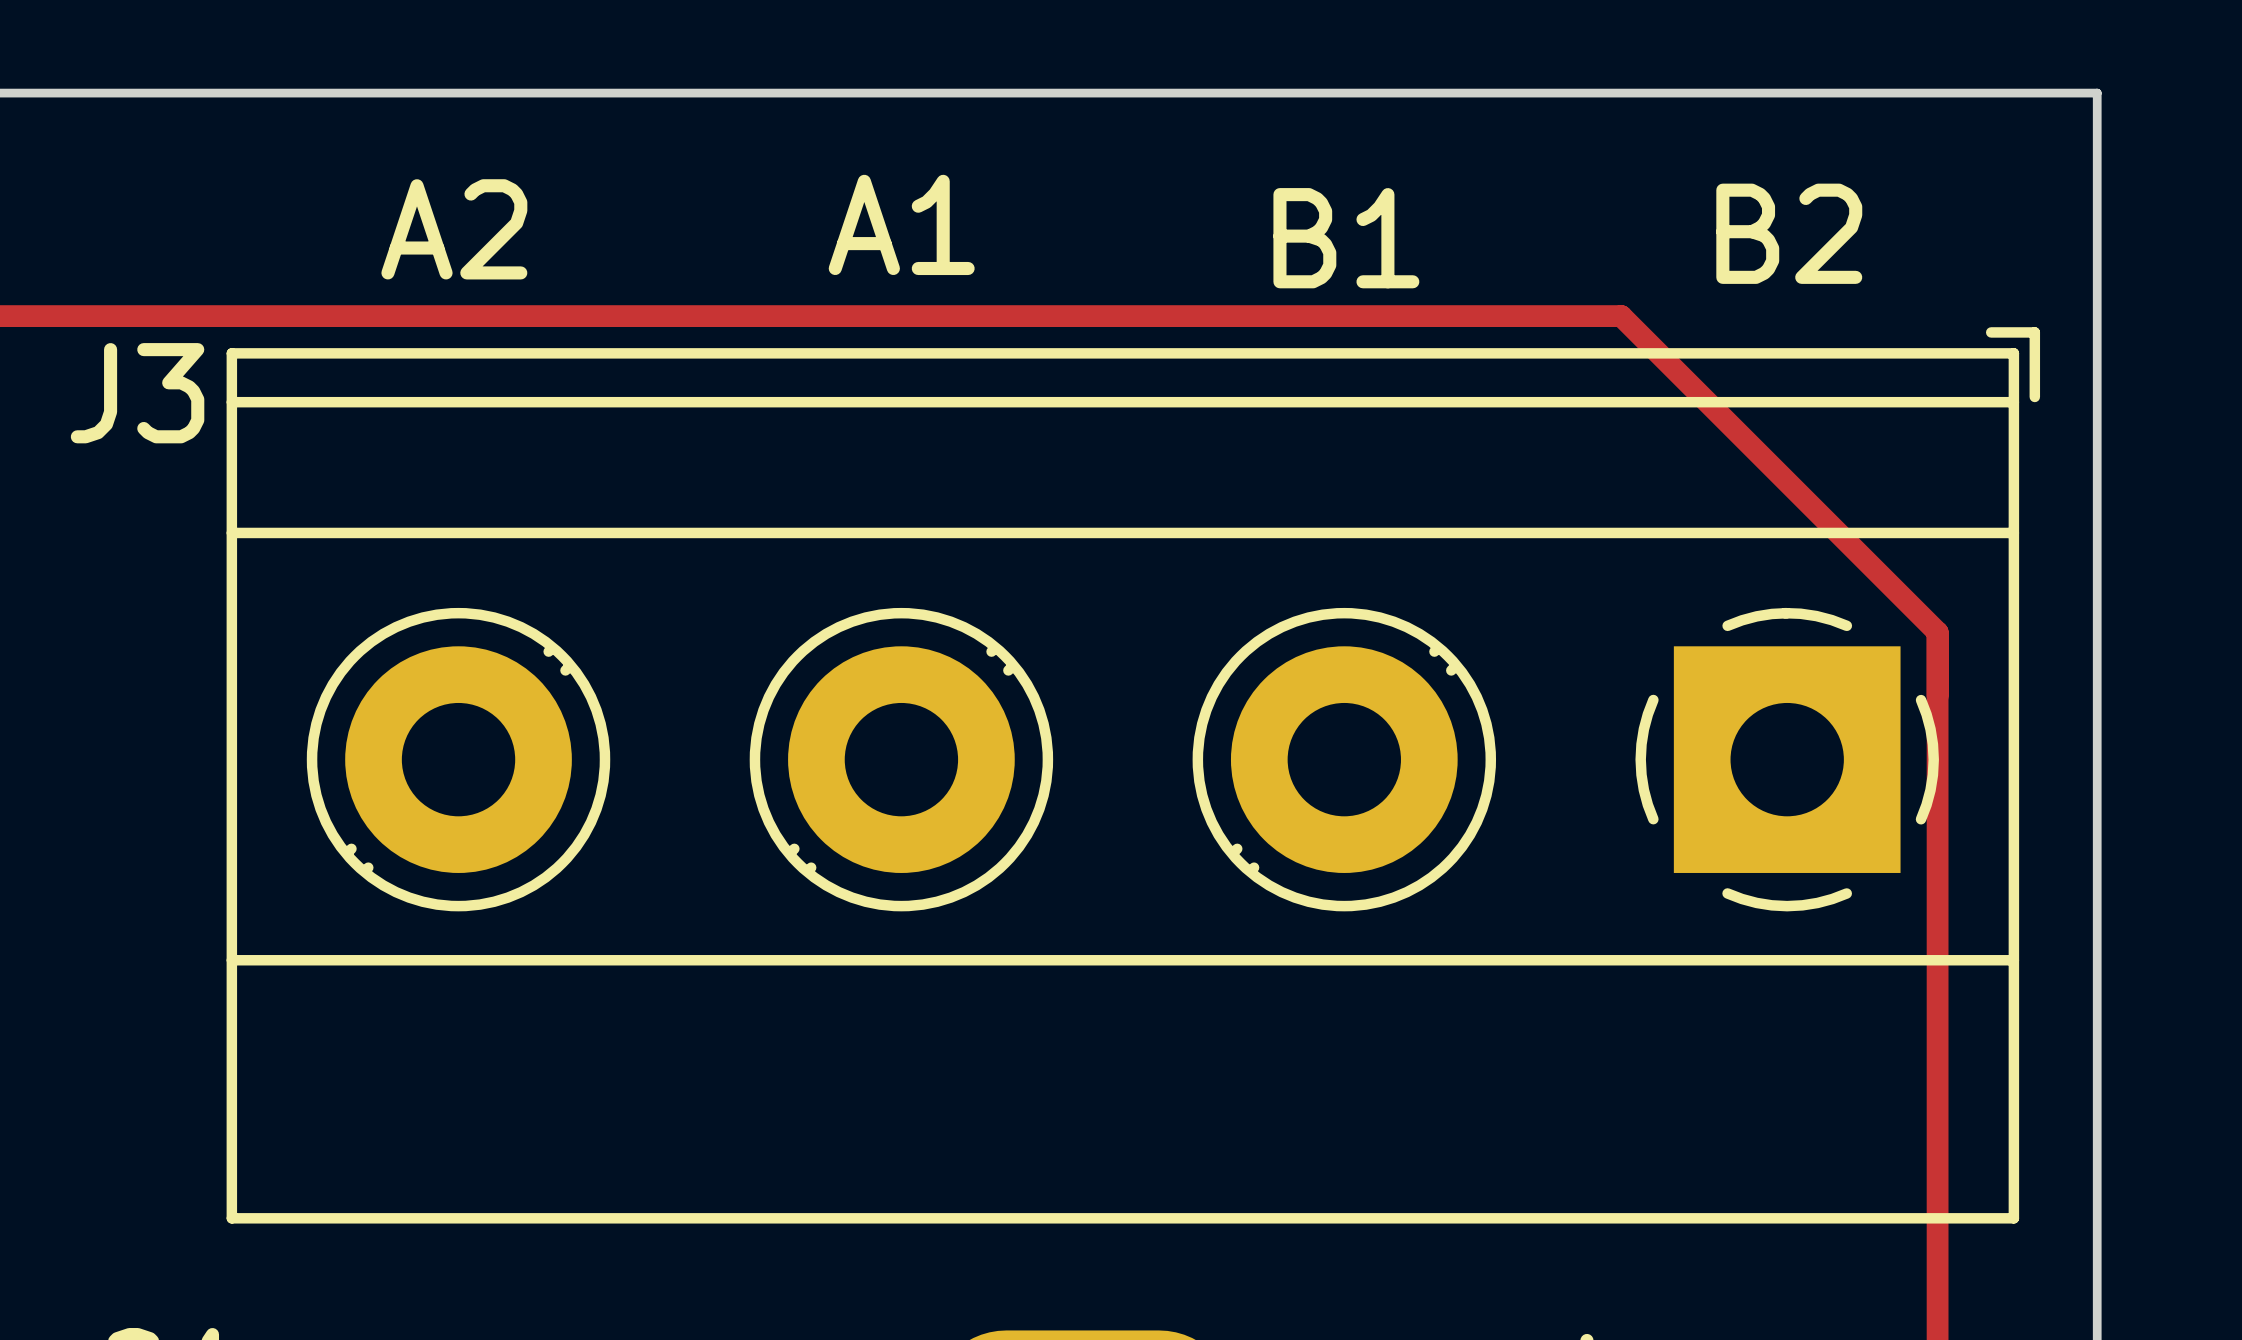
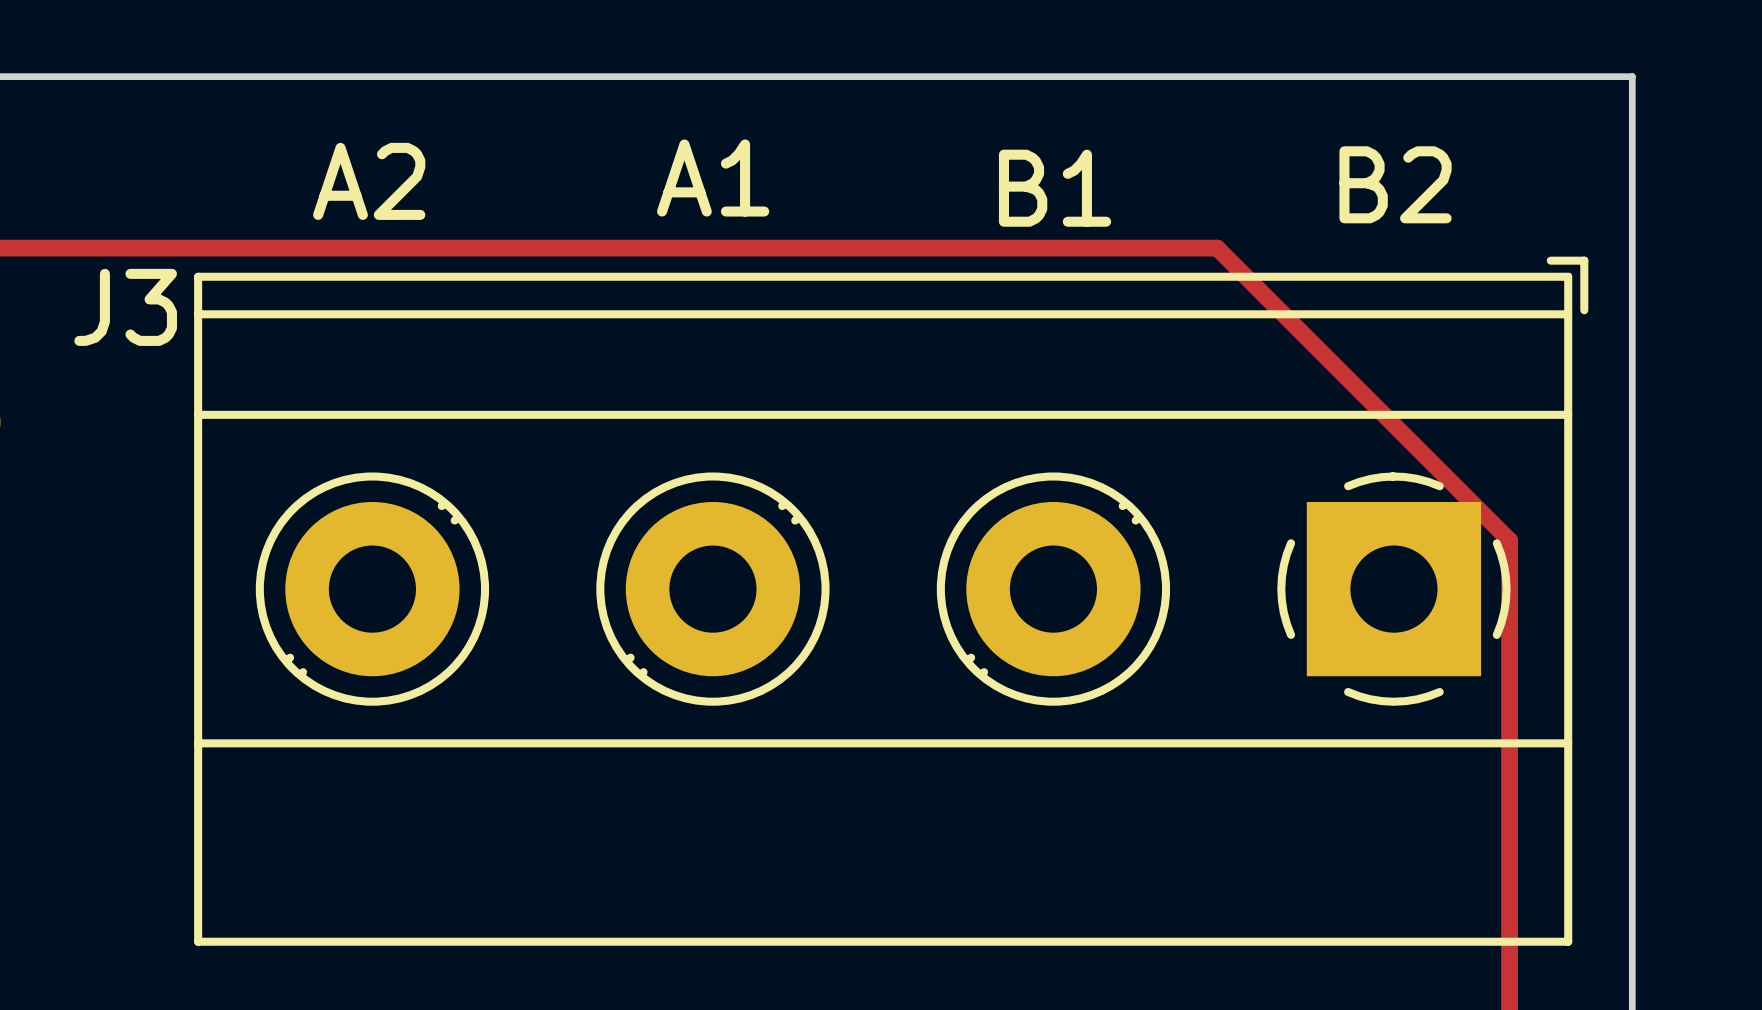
track: (1557, 316) (1621, 316) (1937, 632) (1937, 696) -> (1217, 248) (1509, 540)

